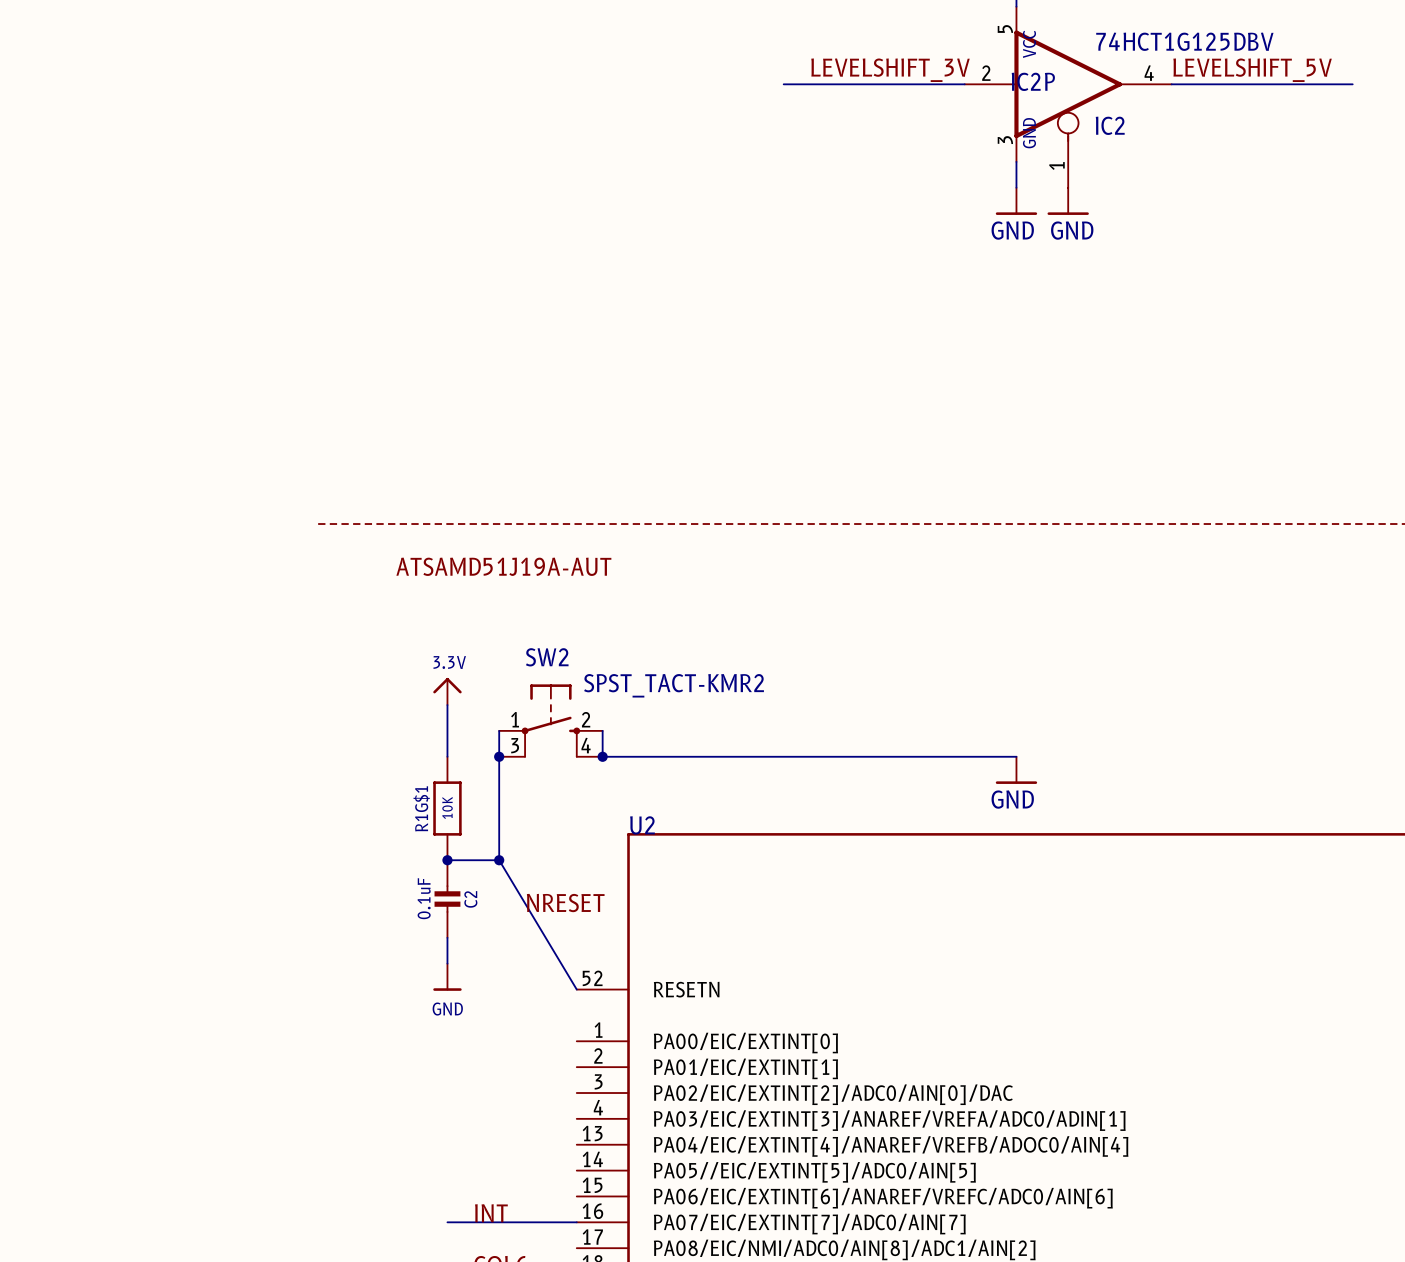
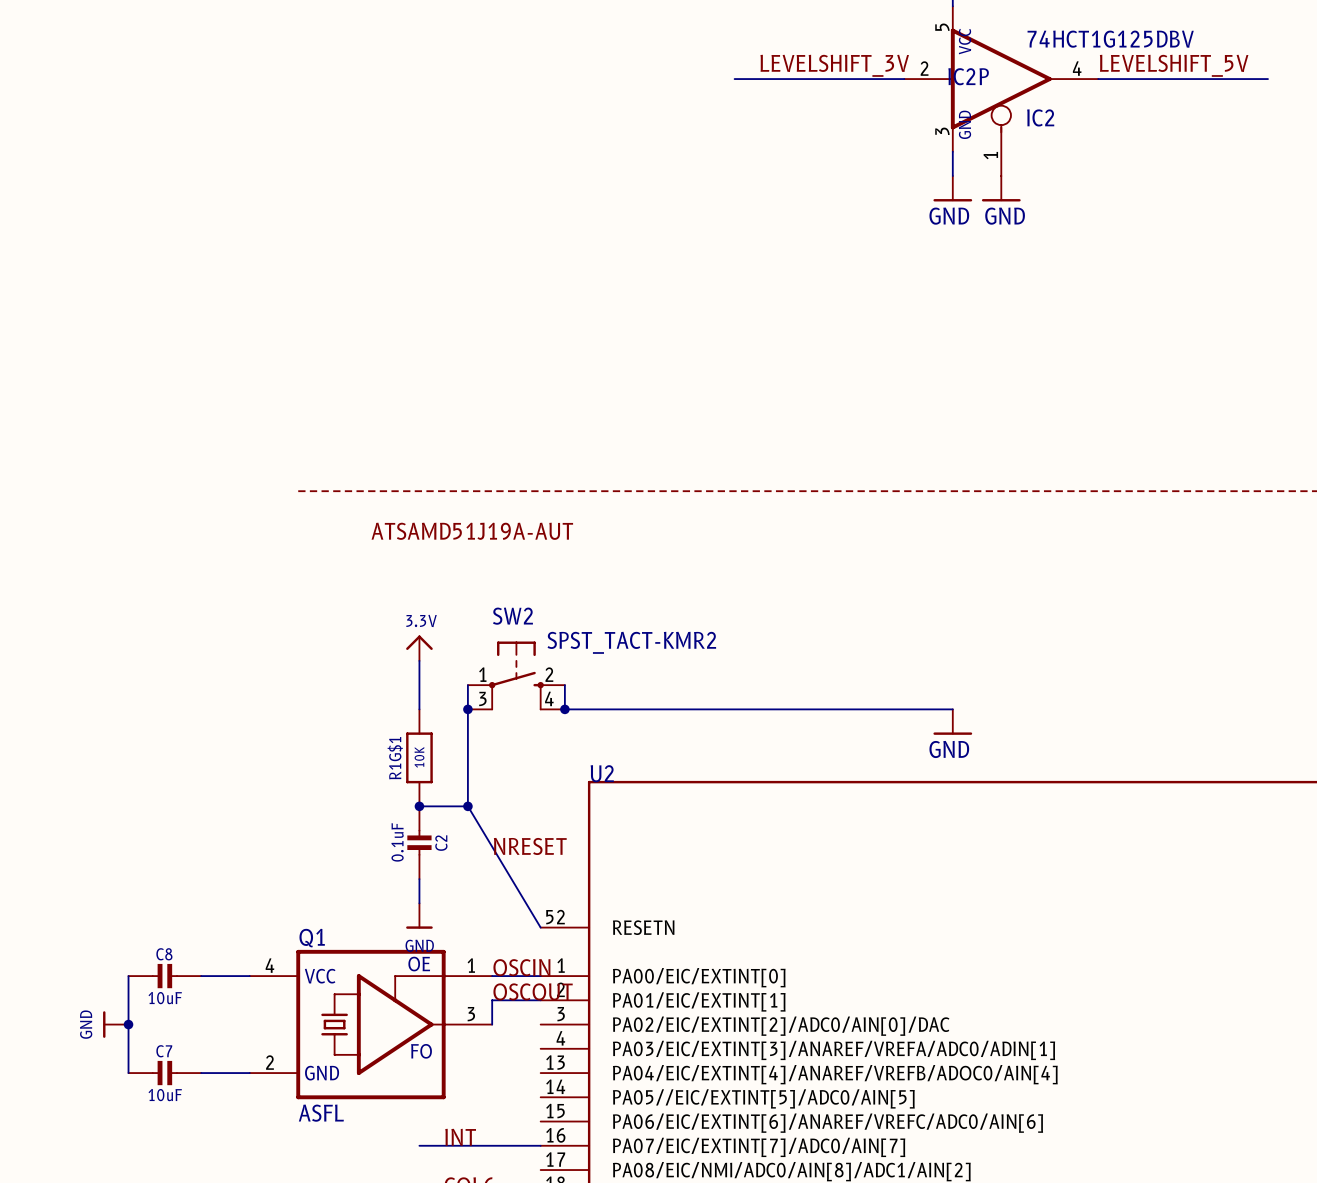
label: none -> OSCIN (521, 967)
wire: none -> (128, 976) (128, 1073)
C8: none -> 10uF (164, 976)
wire: none -> (201, 976) (249, 976)
wire: none -> (492, 976) (540, 976)
label: none -> OSCOUT (533, 991)
wire: none -> (540, 1000) (492, 1000) (492, 1024)
power symbol: none -> GND (115, 1024)
junction: none -> (128, 1024)
Q1: none -> ASFL (370, 1024)
C7: none -> 10uF (164, 1073)
wire: none -> (201, 1073) (249, 1073)

